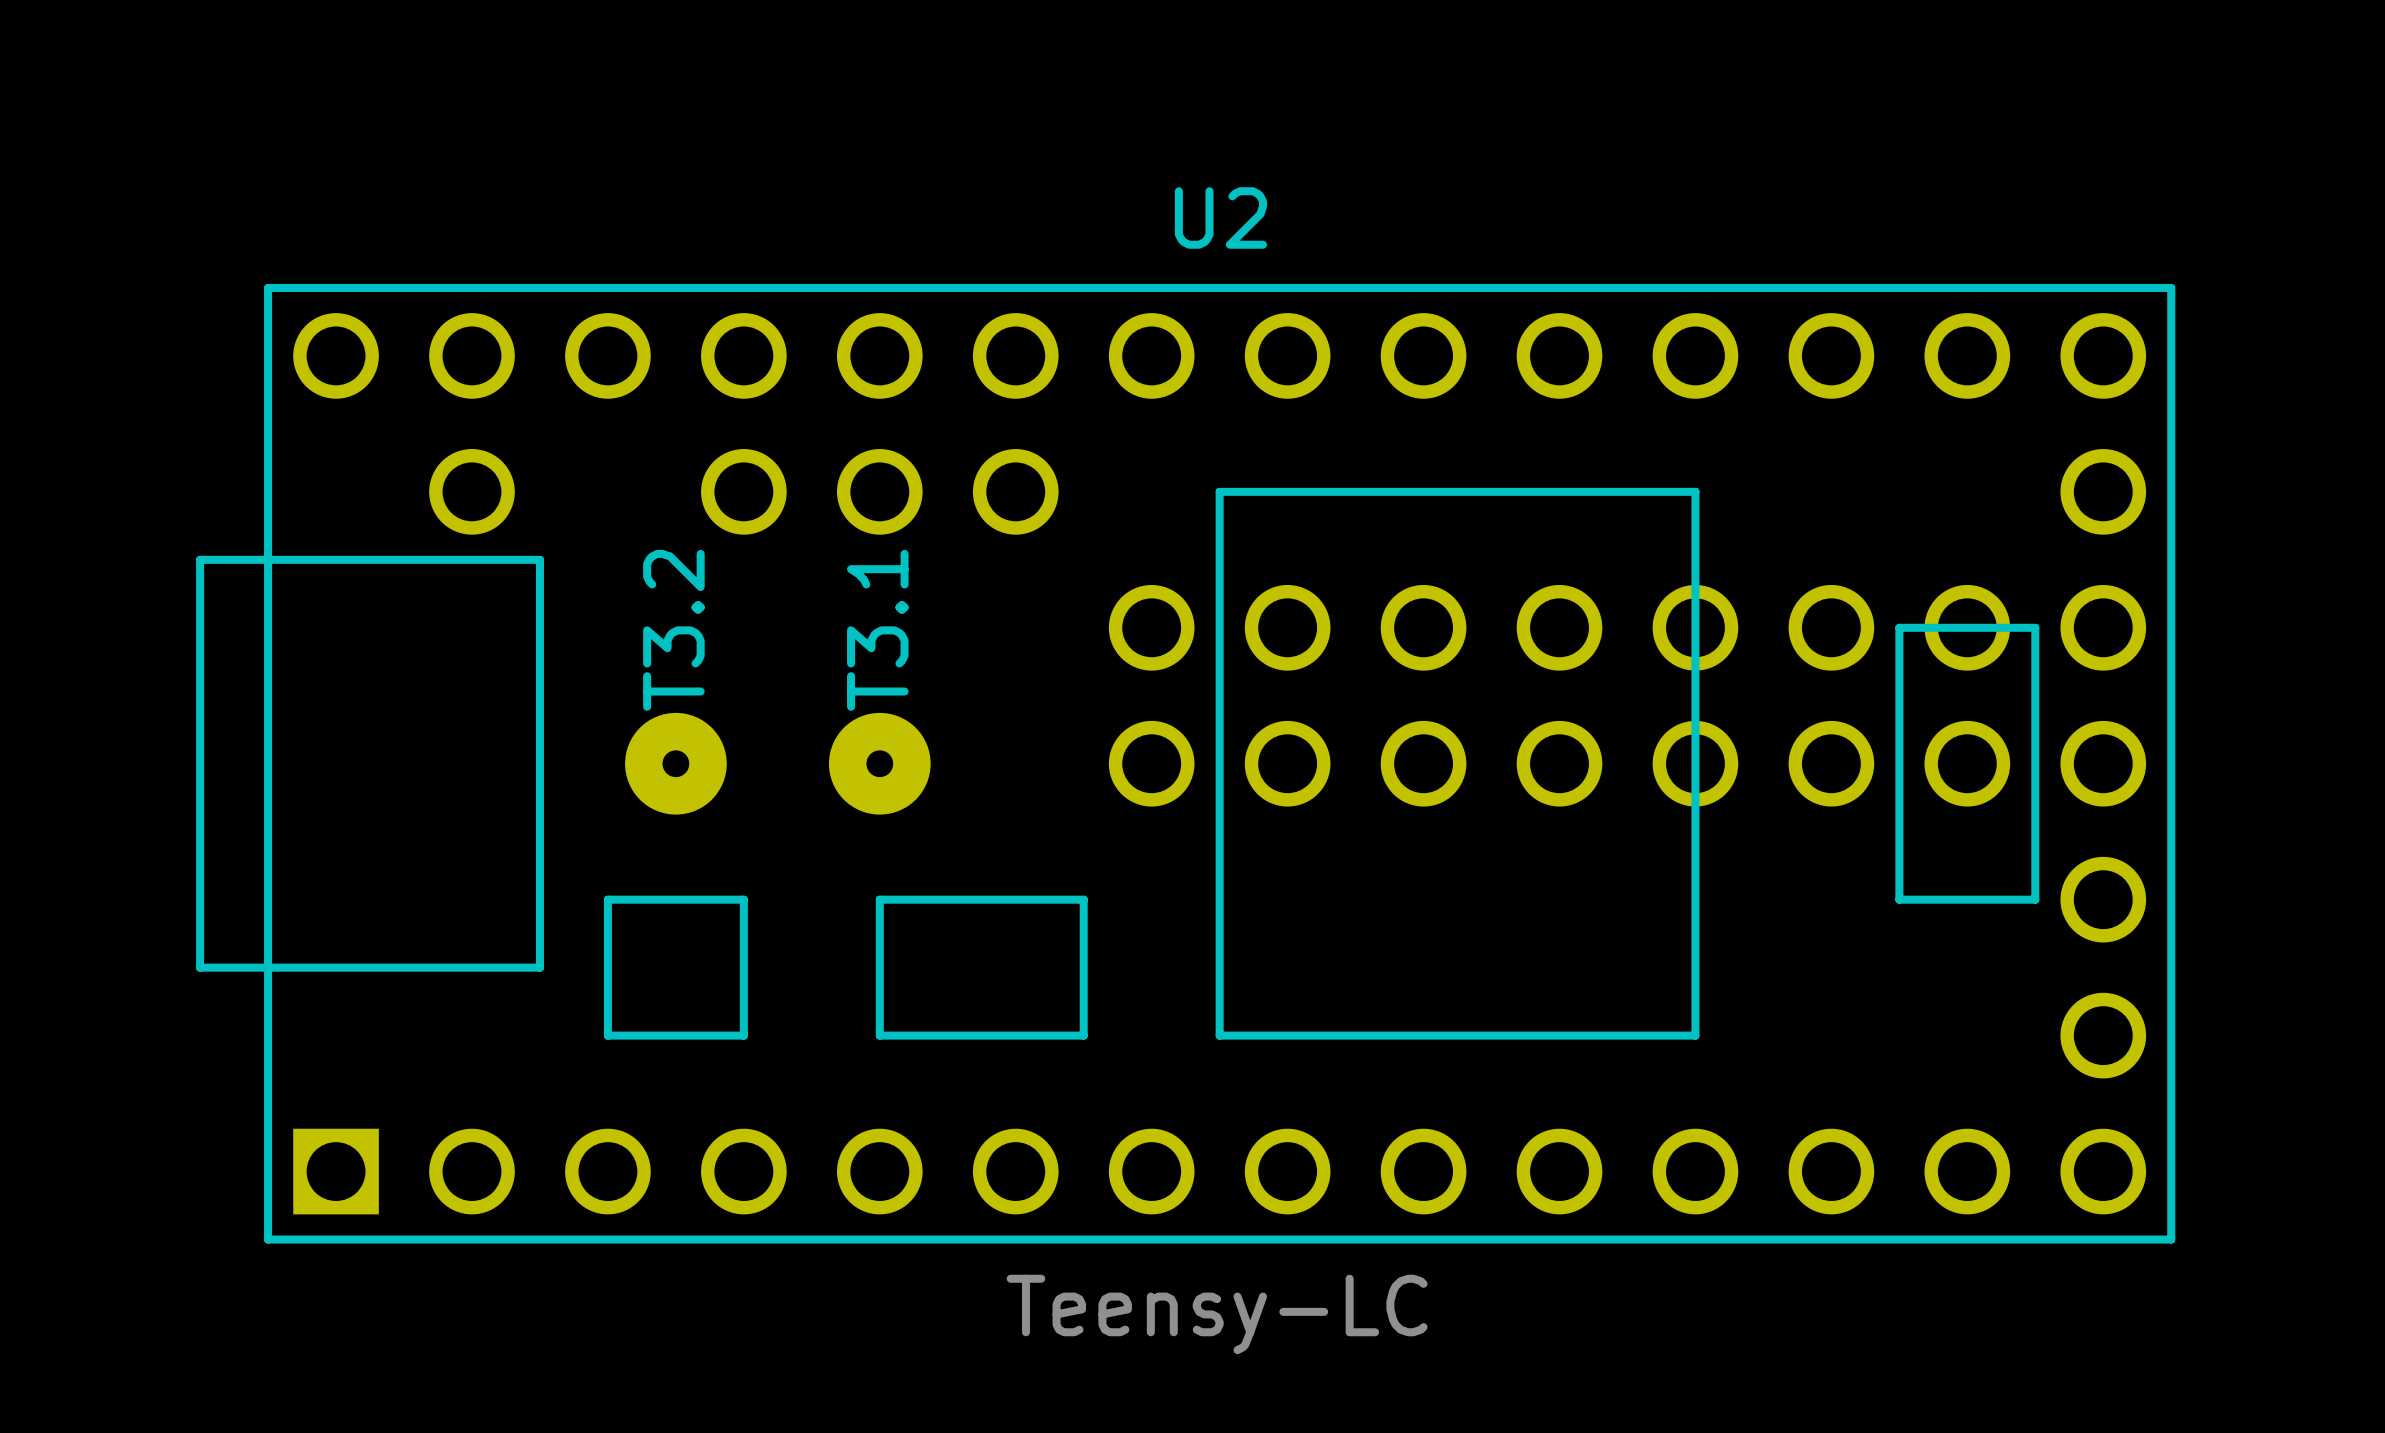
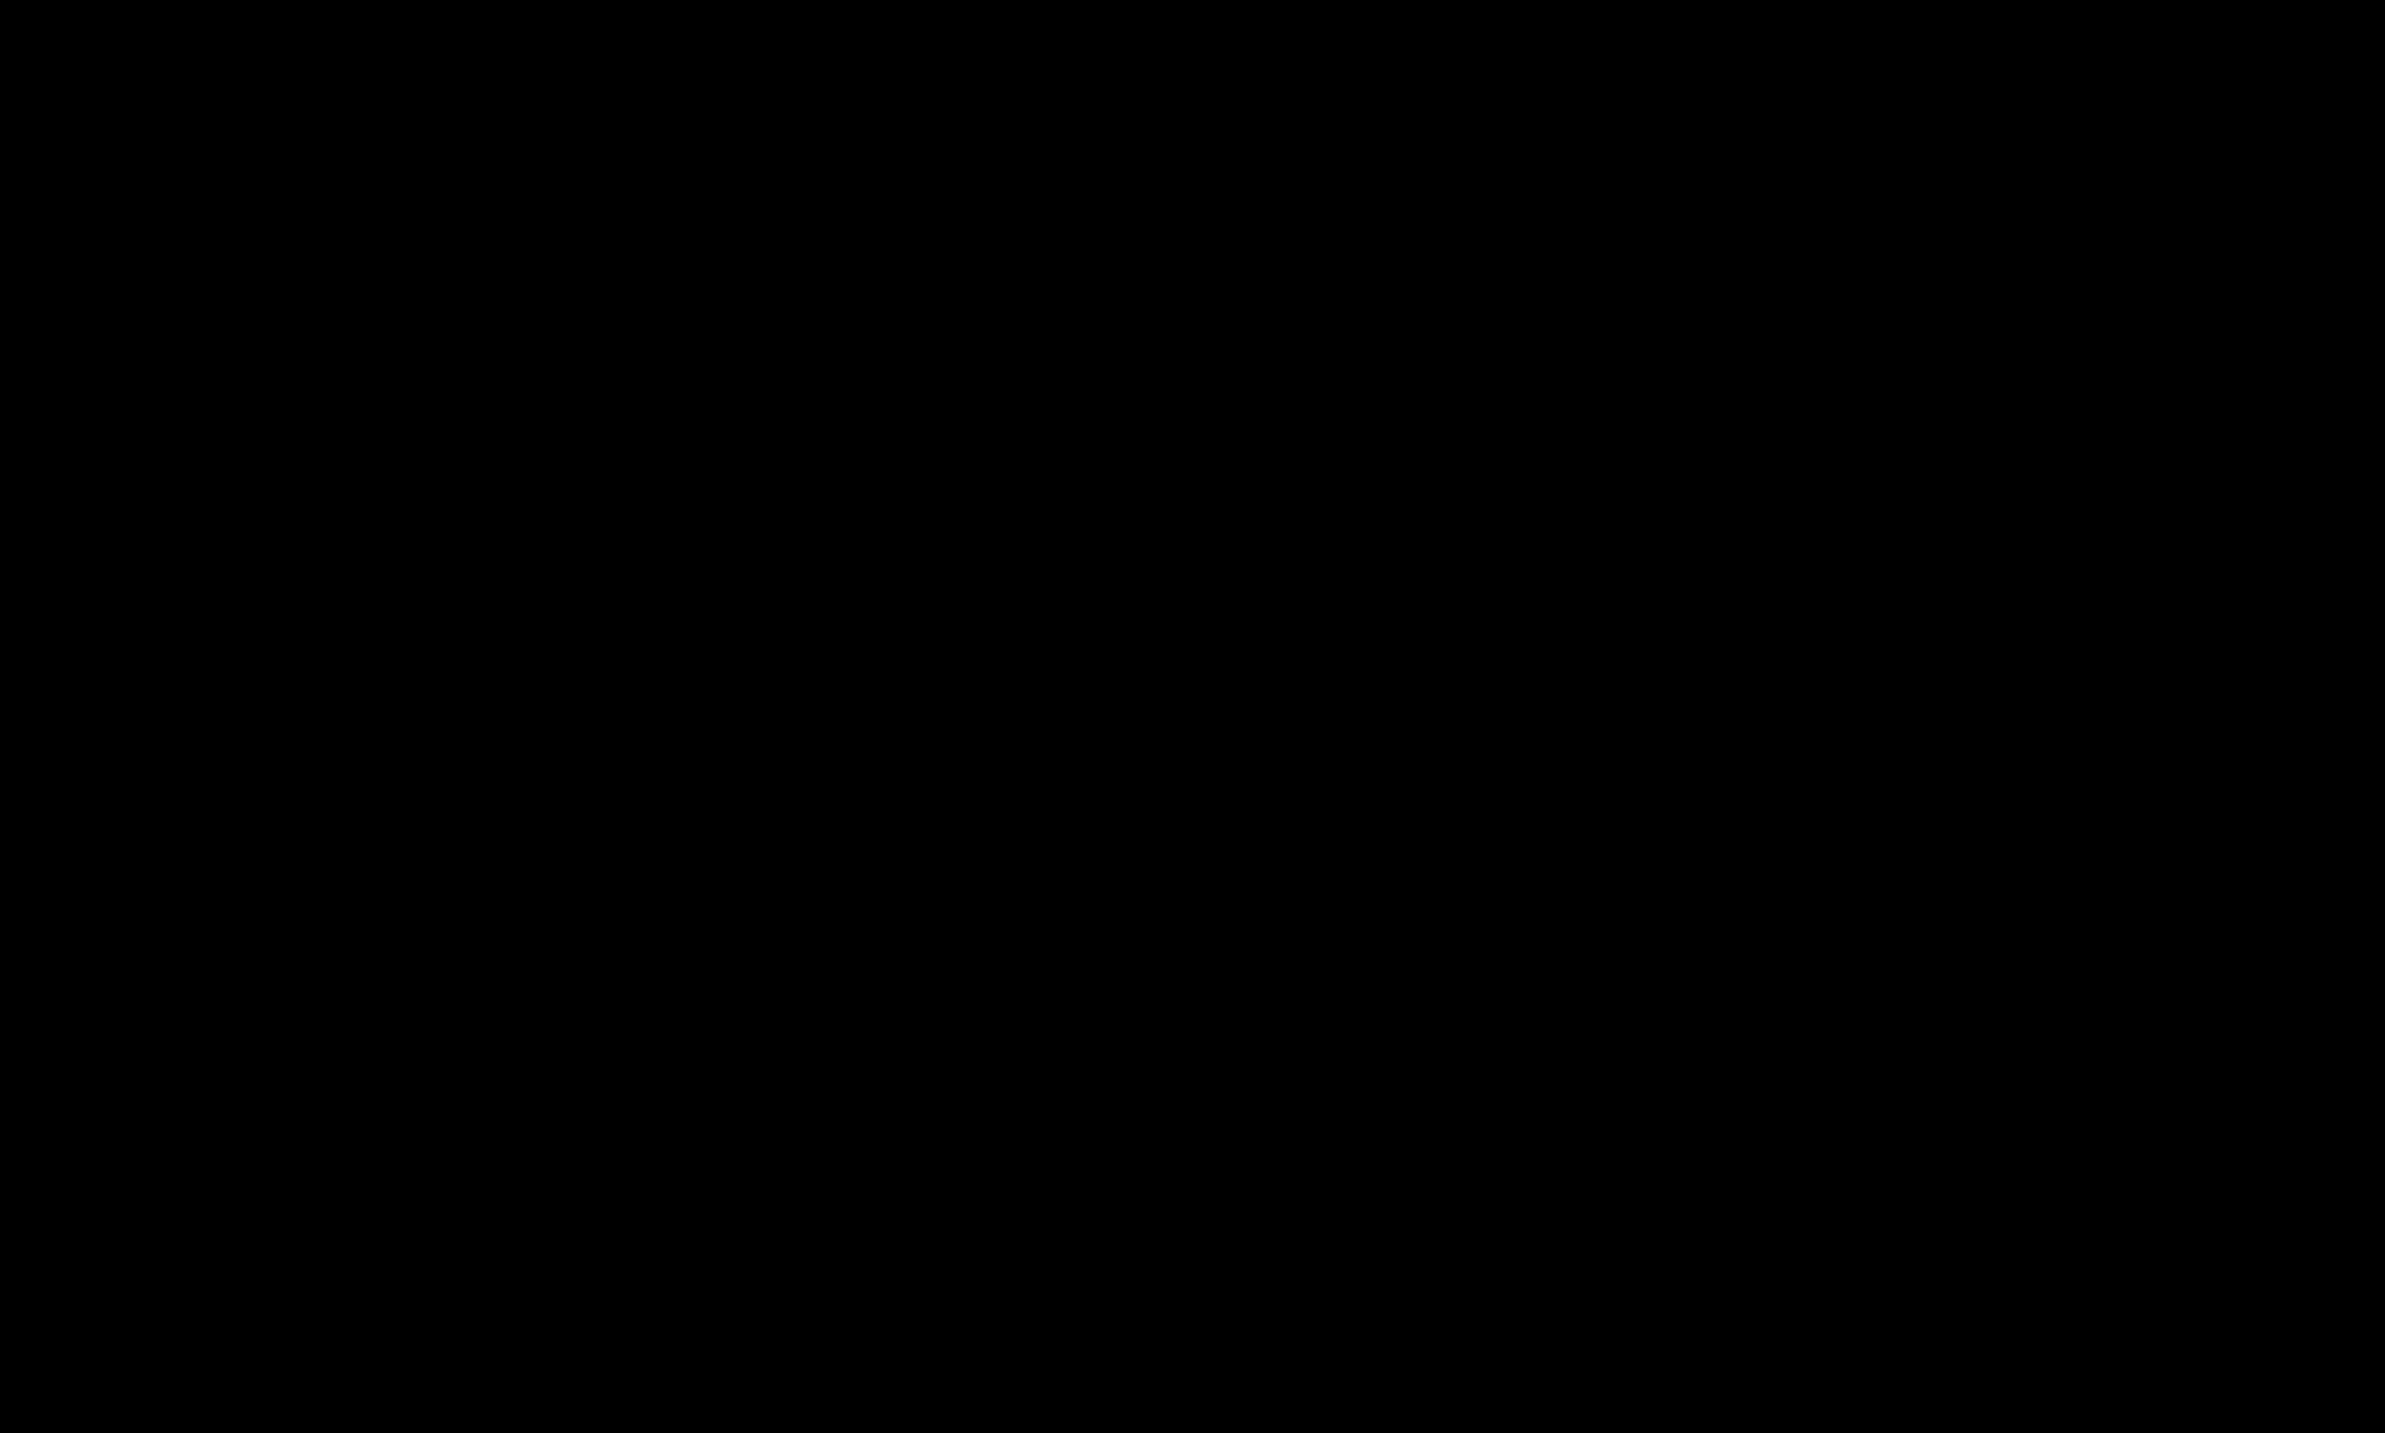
U2: Teensy-LC (1185, 763) -> none

